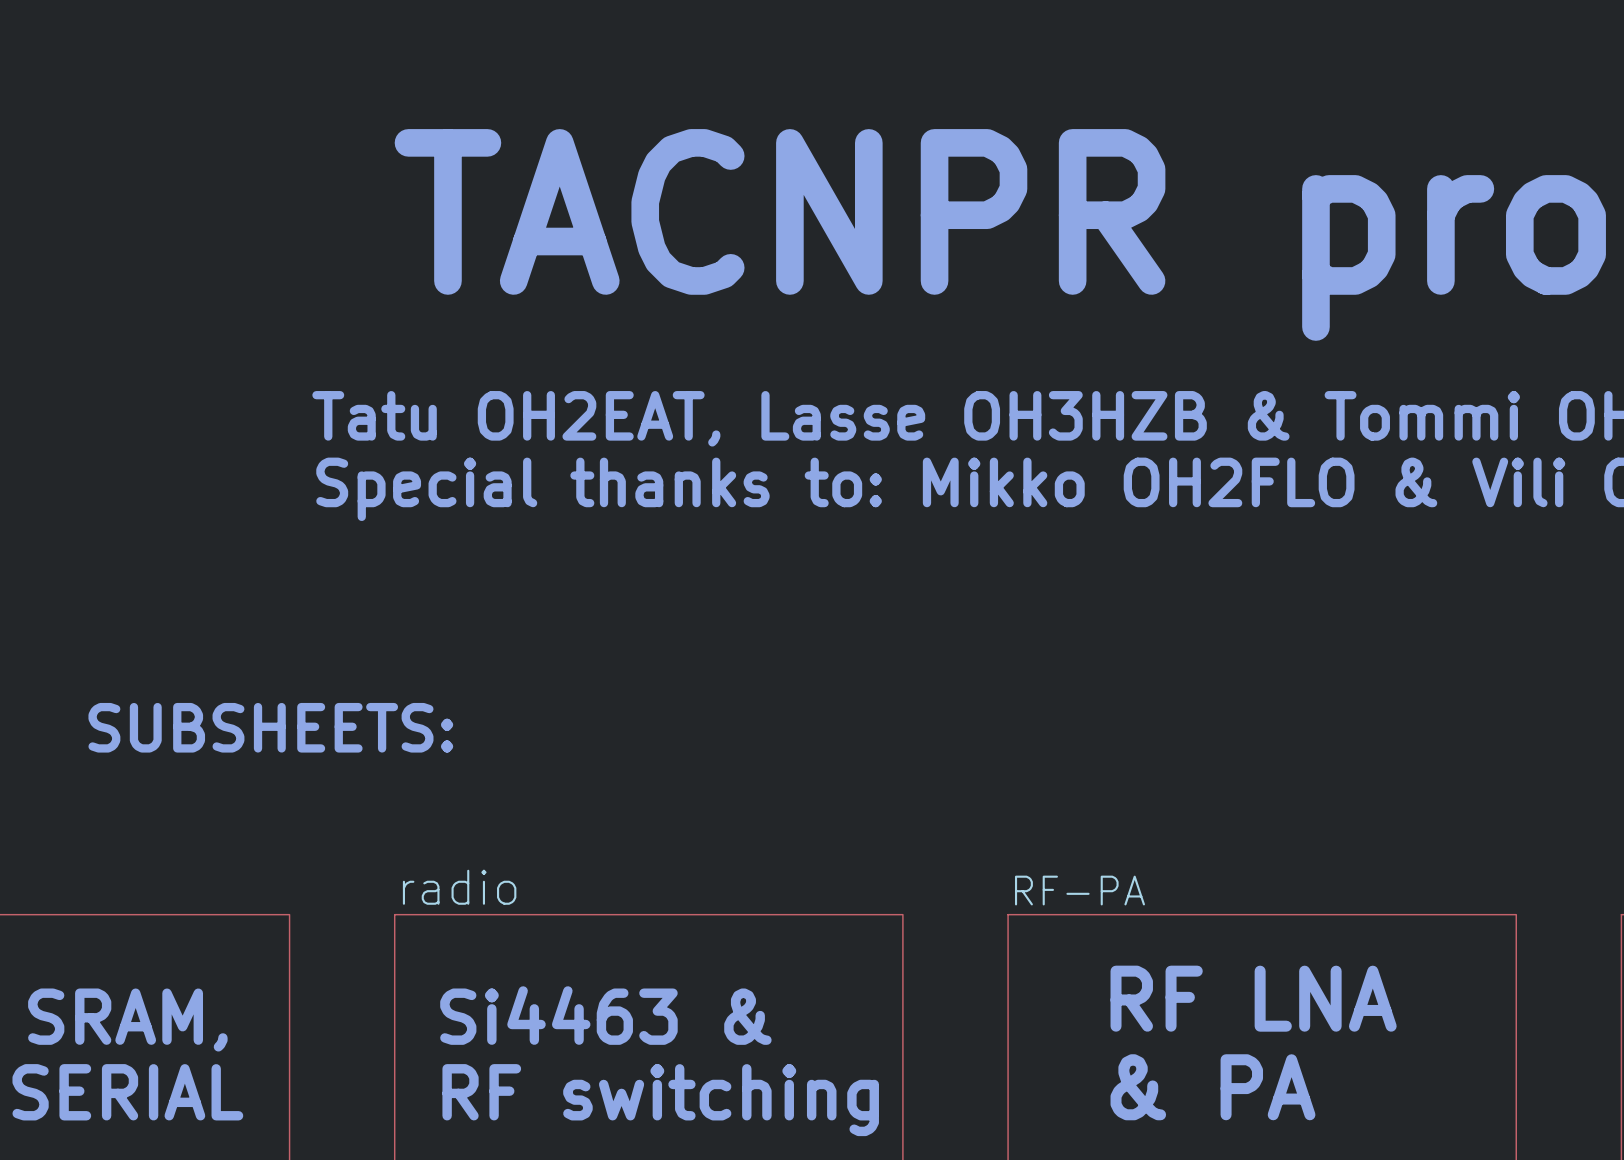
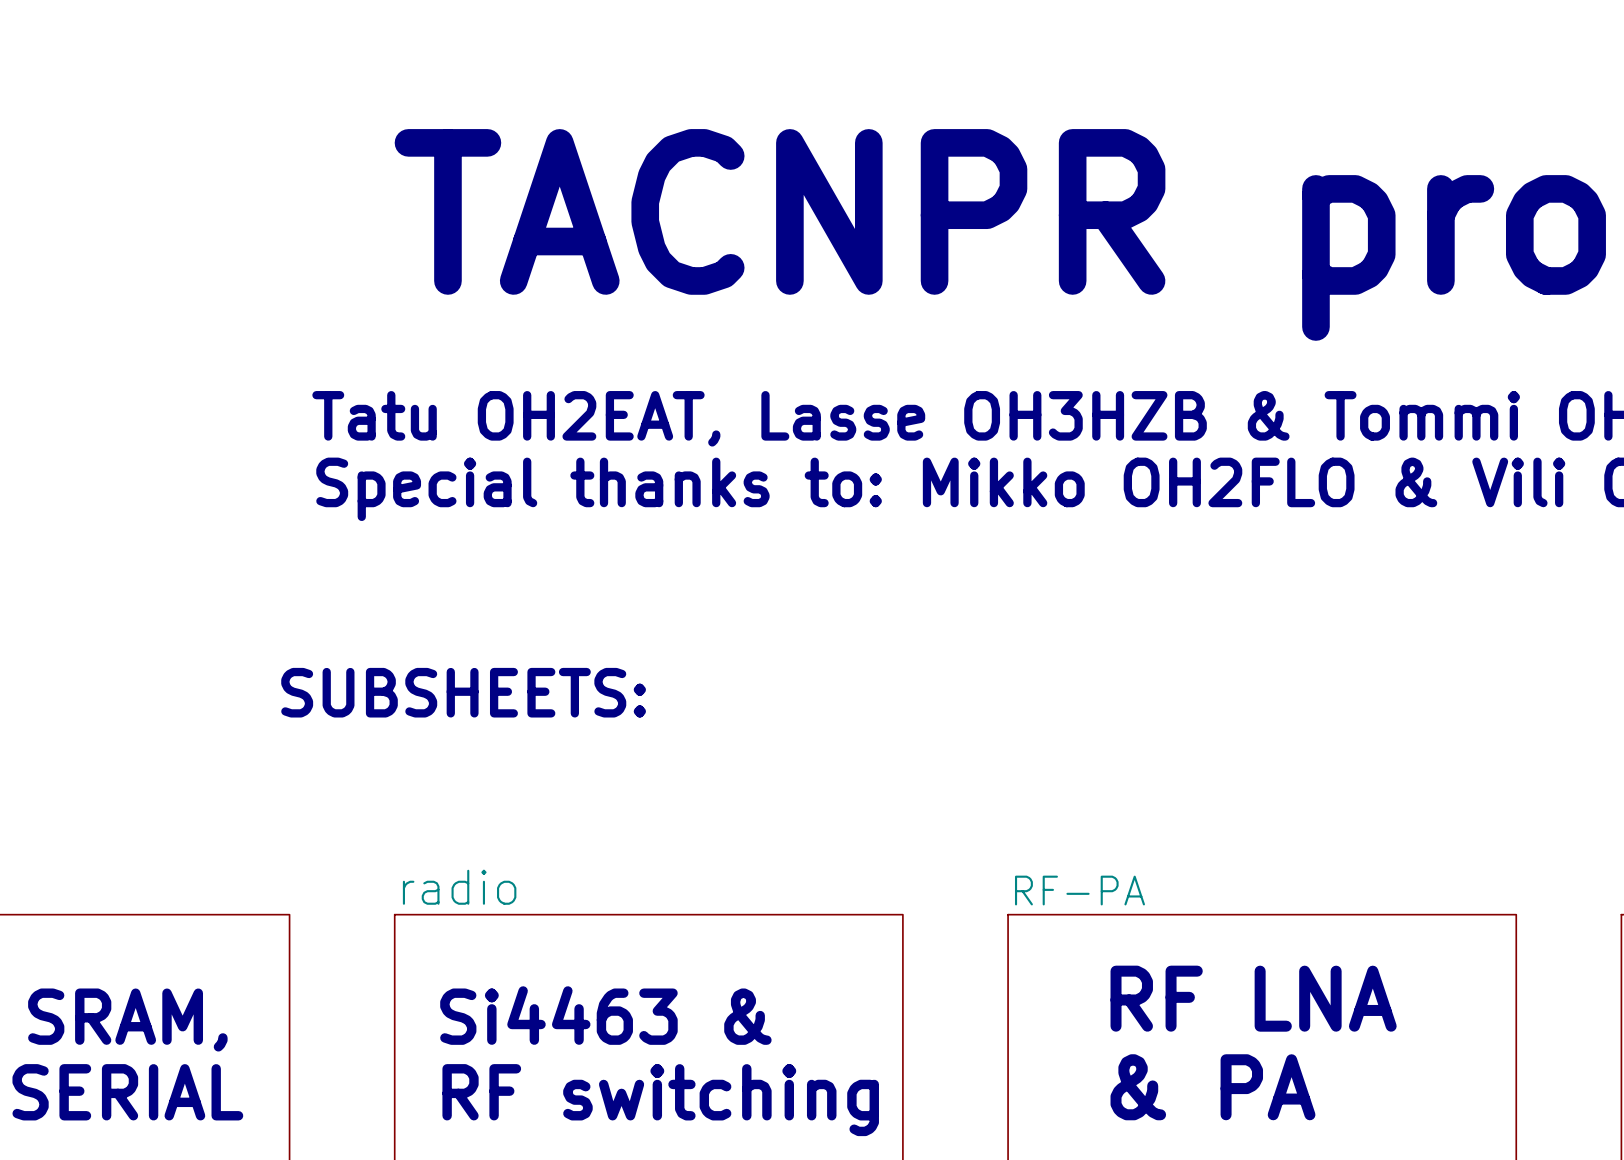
text position: SUBSHEETS: (270, 727) -> SUBSHEETS: (463, 692)

